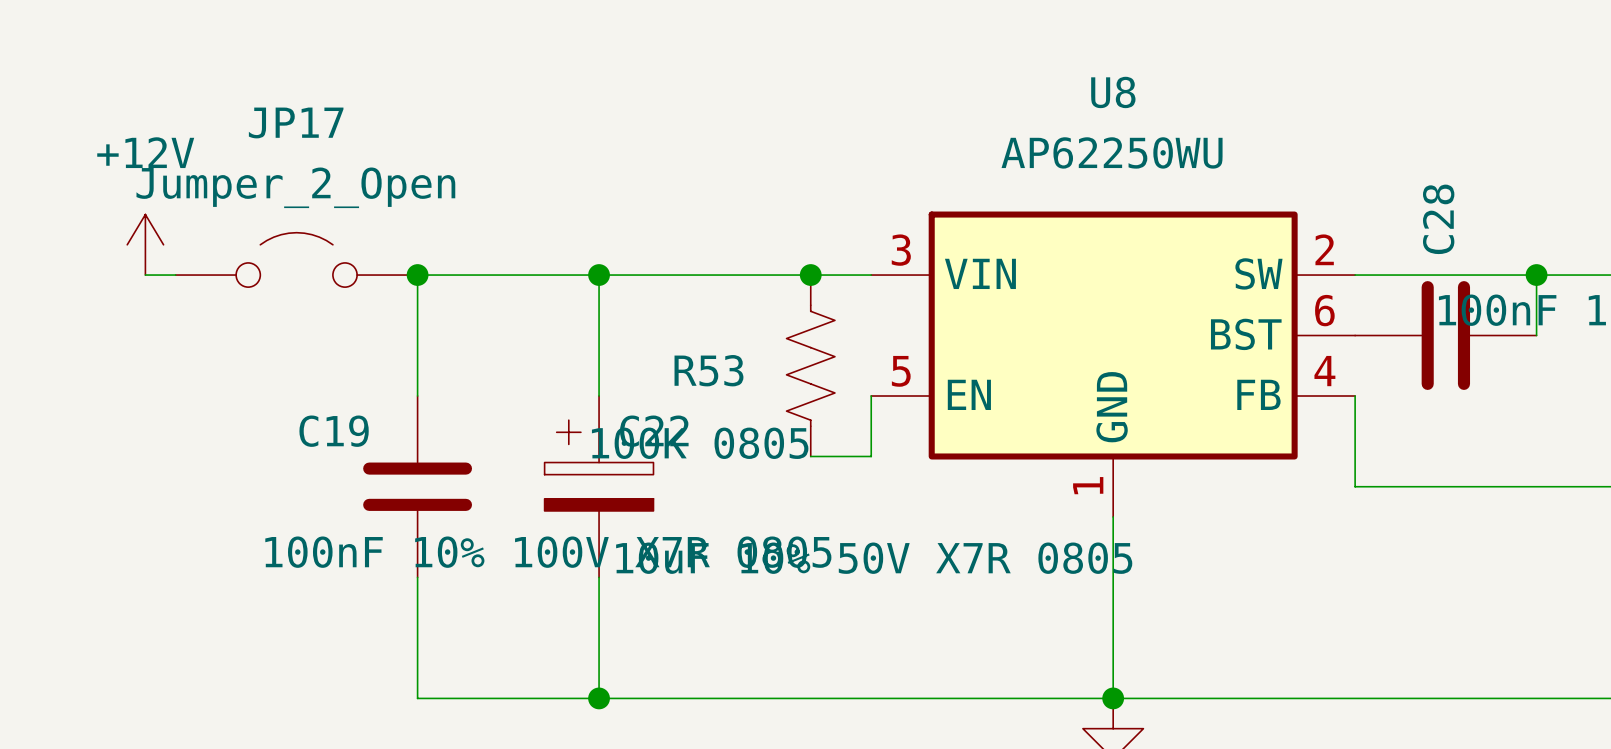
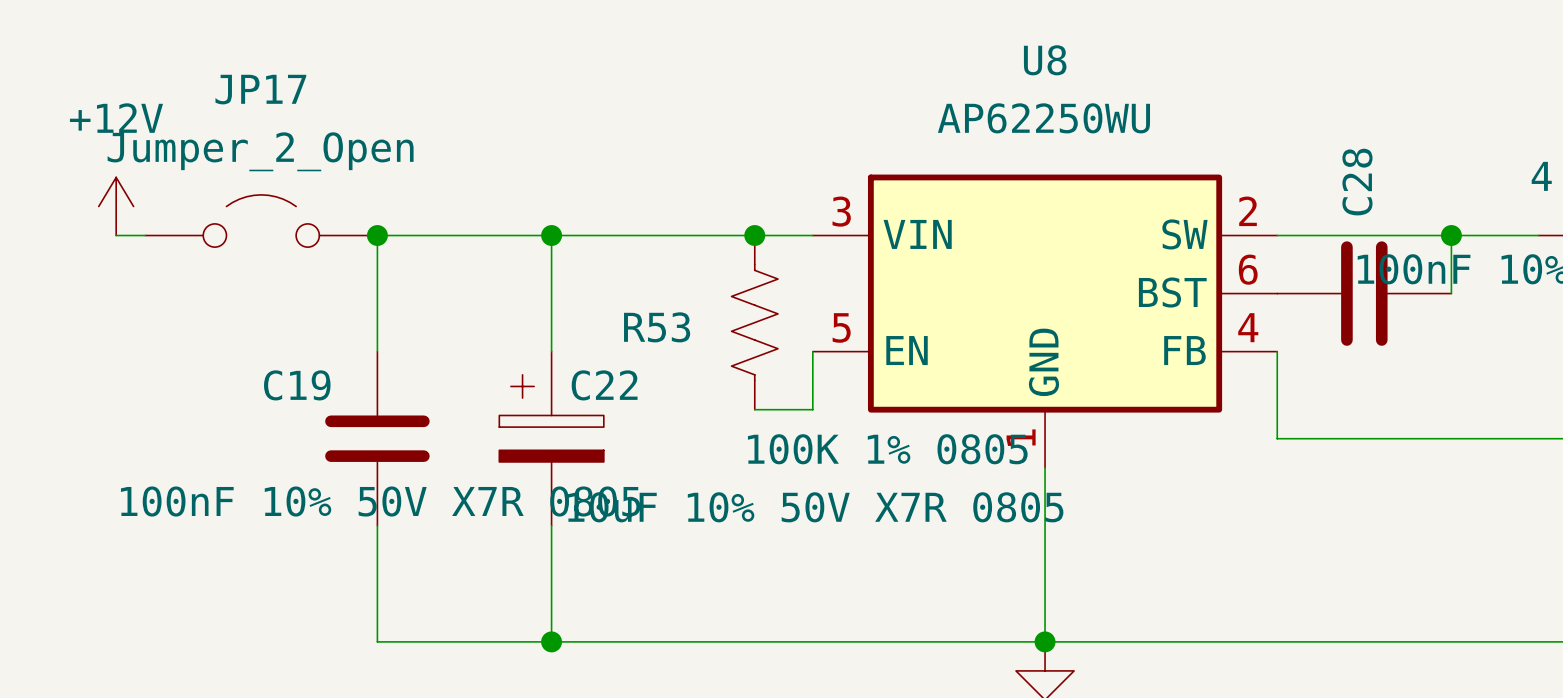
R53 value: 100K 0805 (700, 443) -> 100K 1% 0805 (887, 449)
C19 value: 100nF 10% 100V X7R 0805 (548, 552) -> 100nF 10% 50V X7R 0805 (380, 501)

